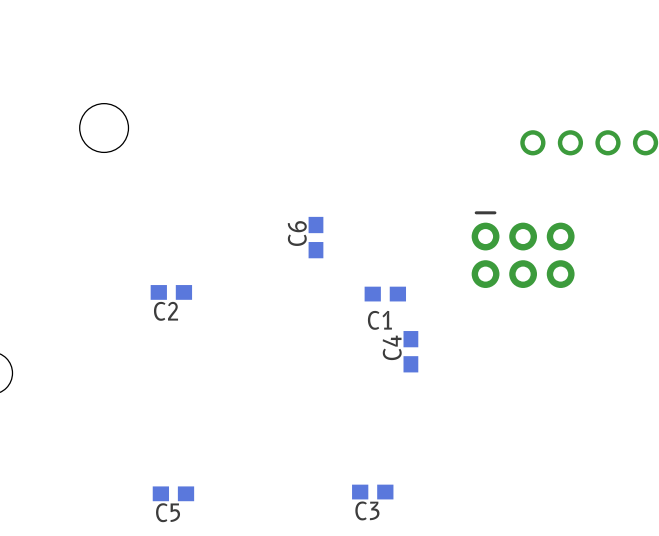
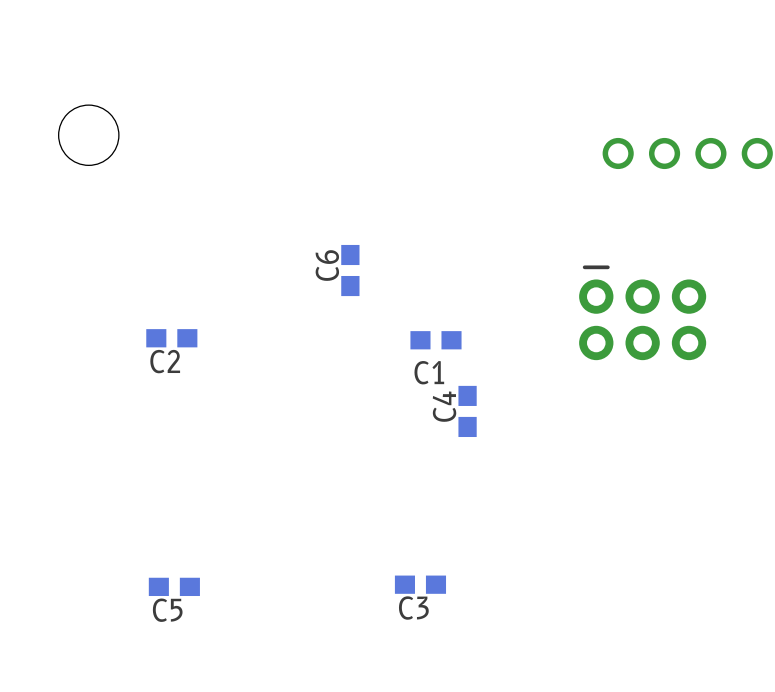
part position: (523, 249) -> (642, 312)

